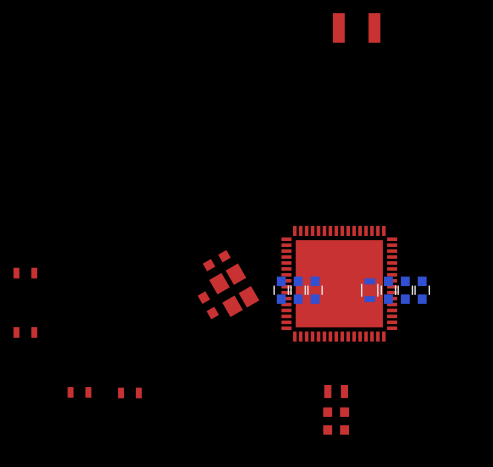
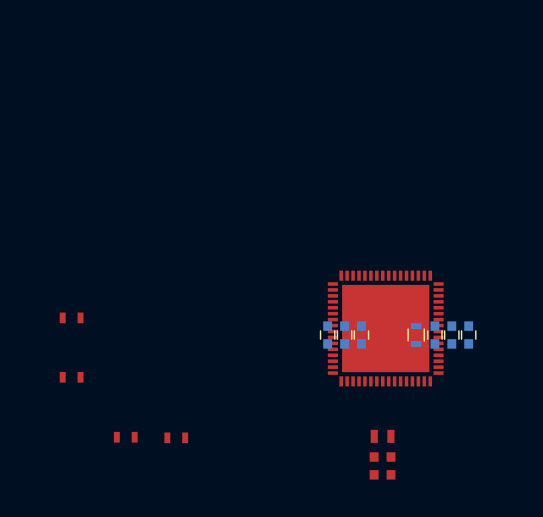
part: (356, 27) -> none
part: (216, 260) -> none
part: (234, 290) -> none
part: (208, 305) -> none

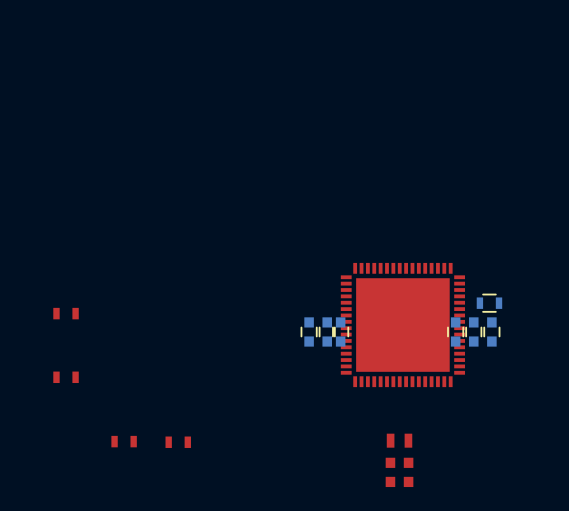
part: none -> (309, 331)
part: none -> (327, 331)
part: (344, 335) -> none
part: (361, 335) -> none
part rotation: 0° (416, 335) -> 90° clockwise (489, 303)
part position: (416, 335) -> (489, 303)

